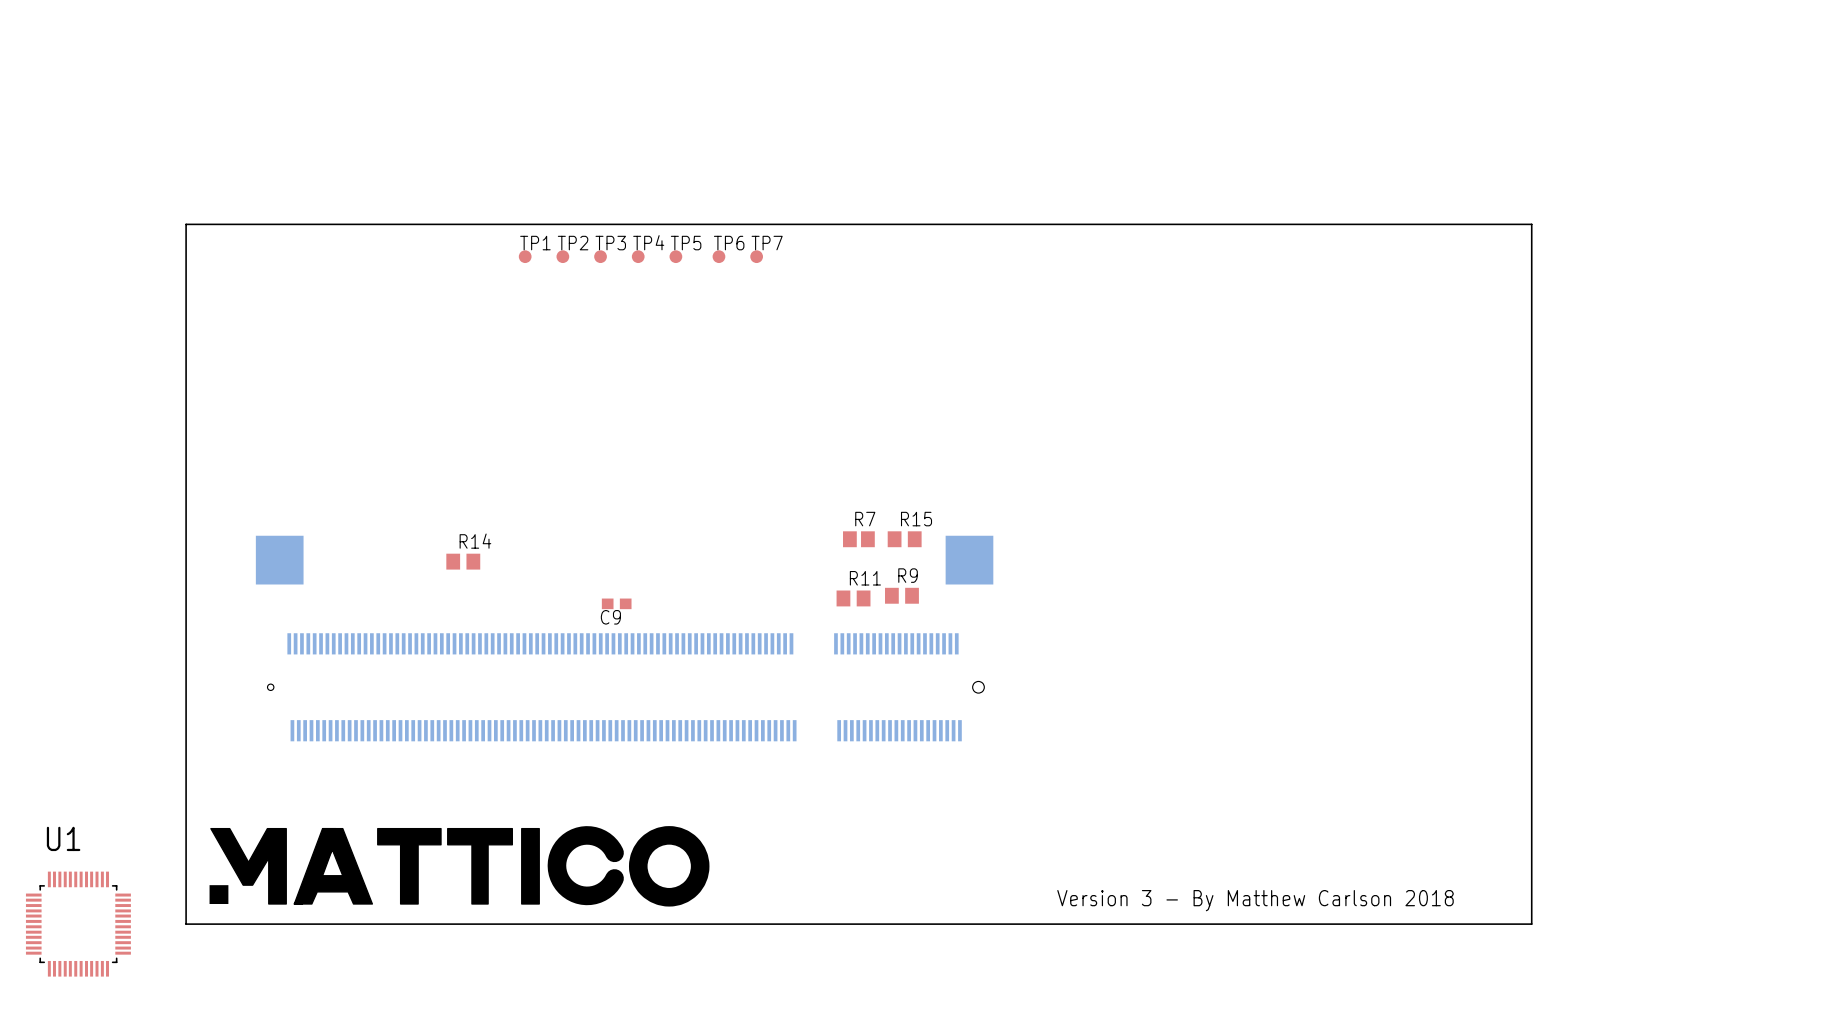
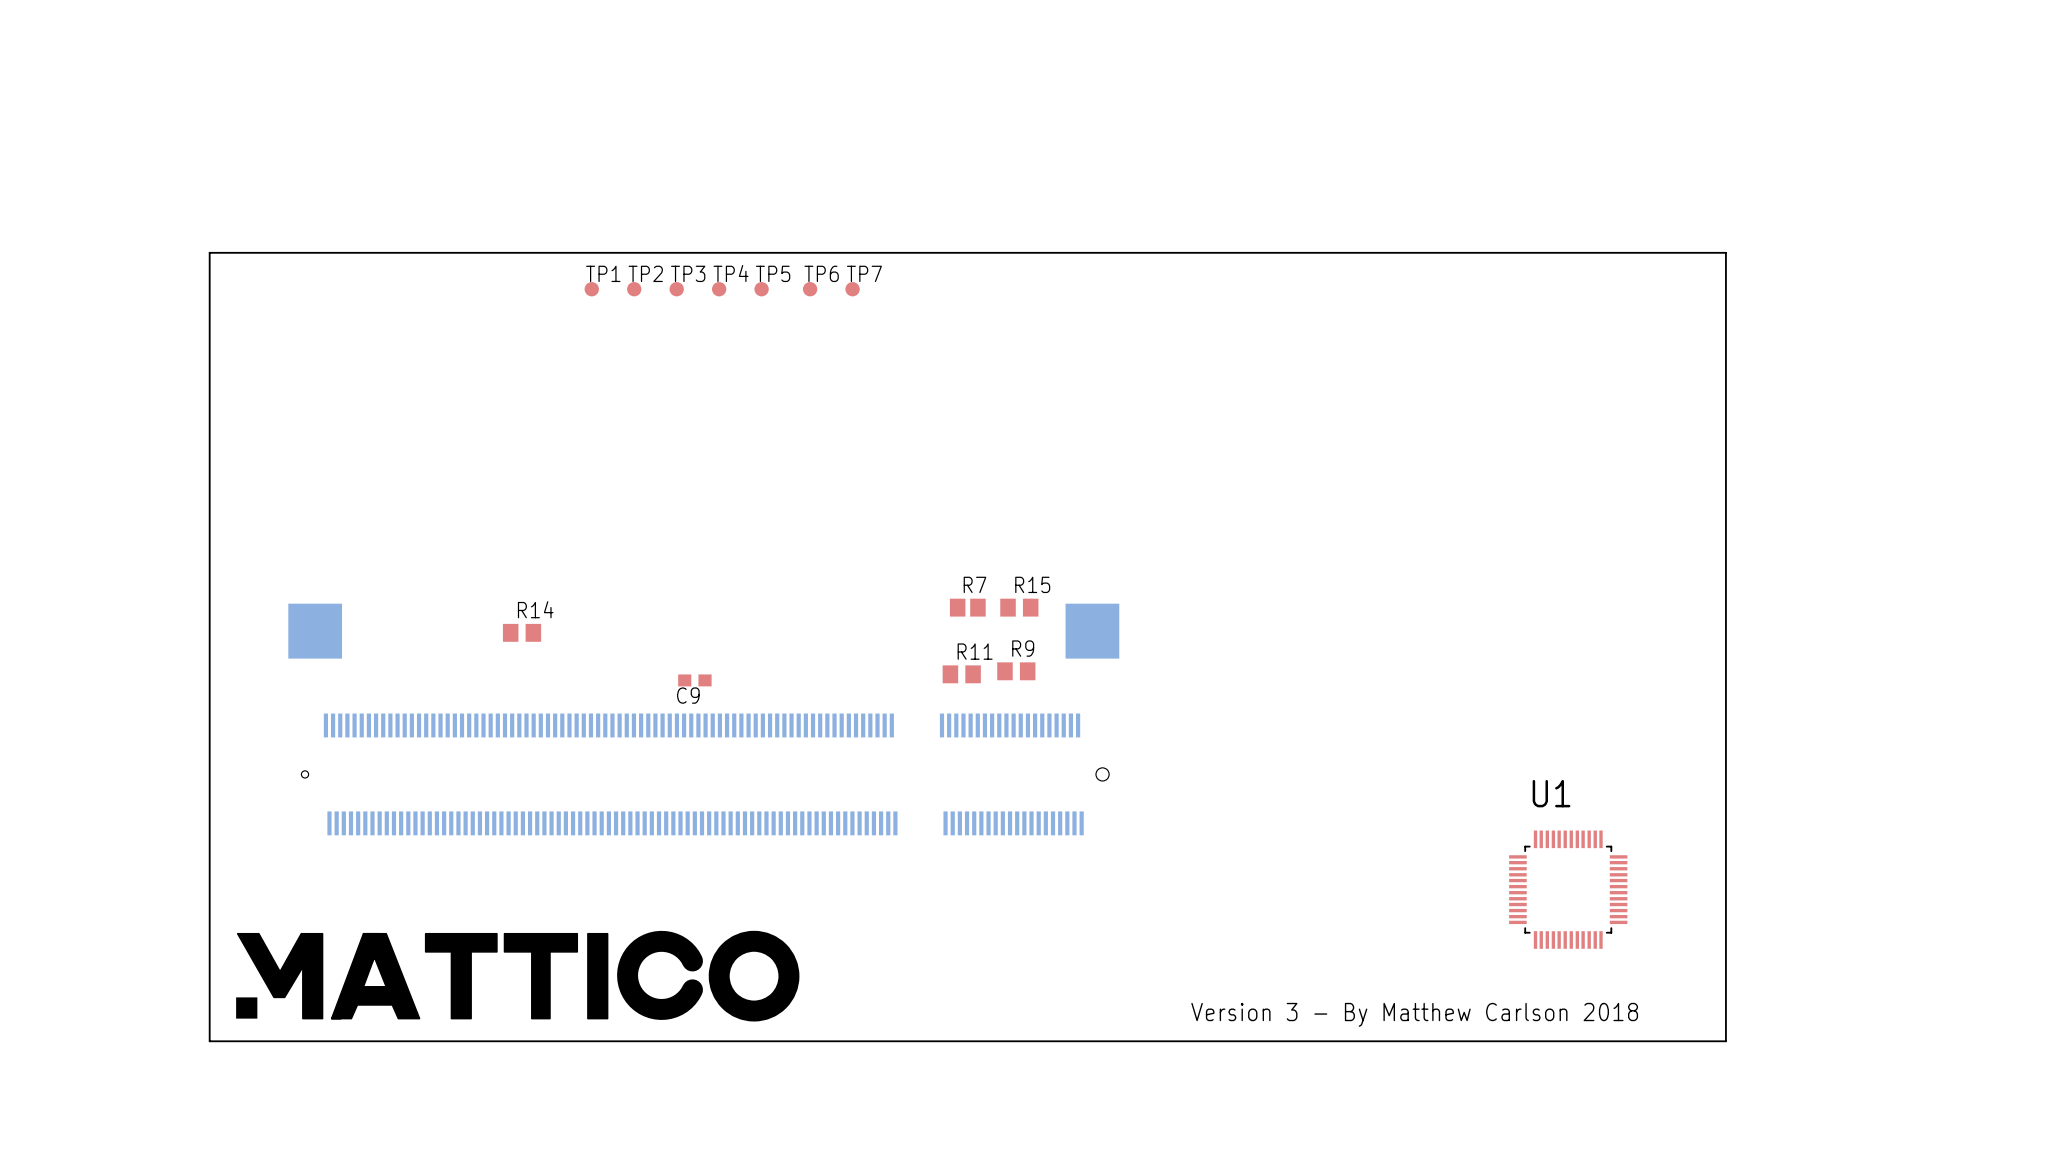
U1 position: (78, 924) -> (1568, 889)

